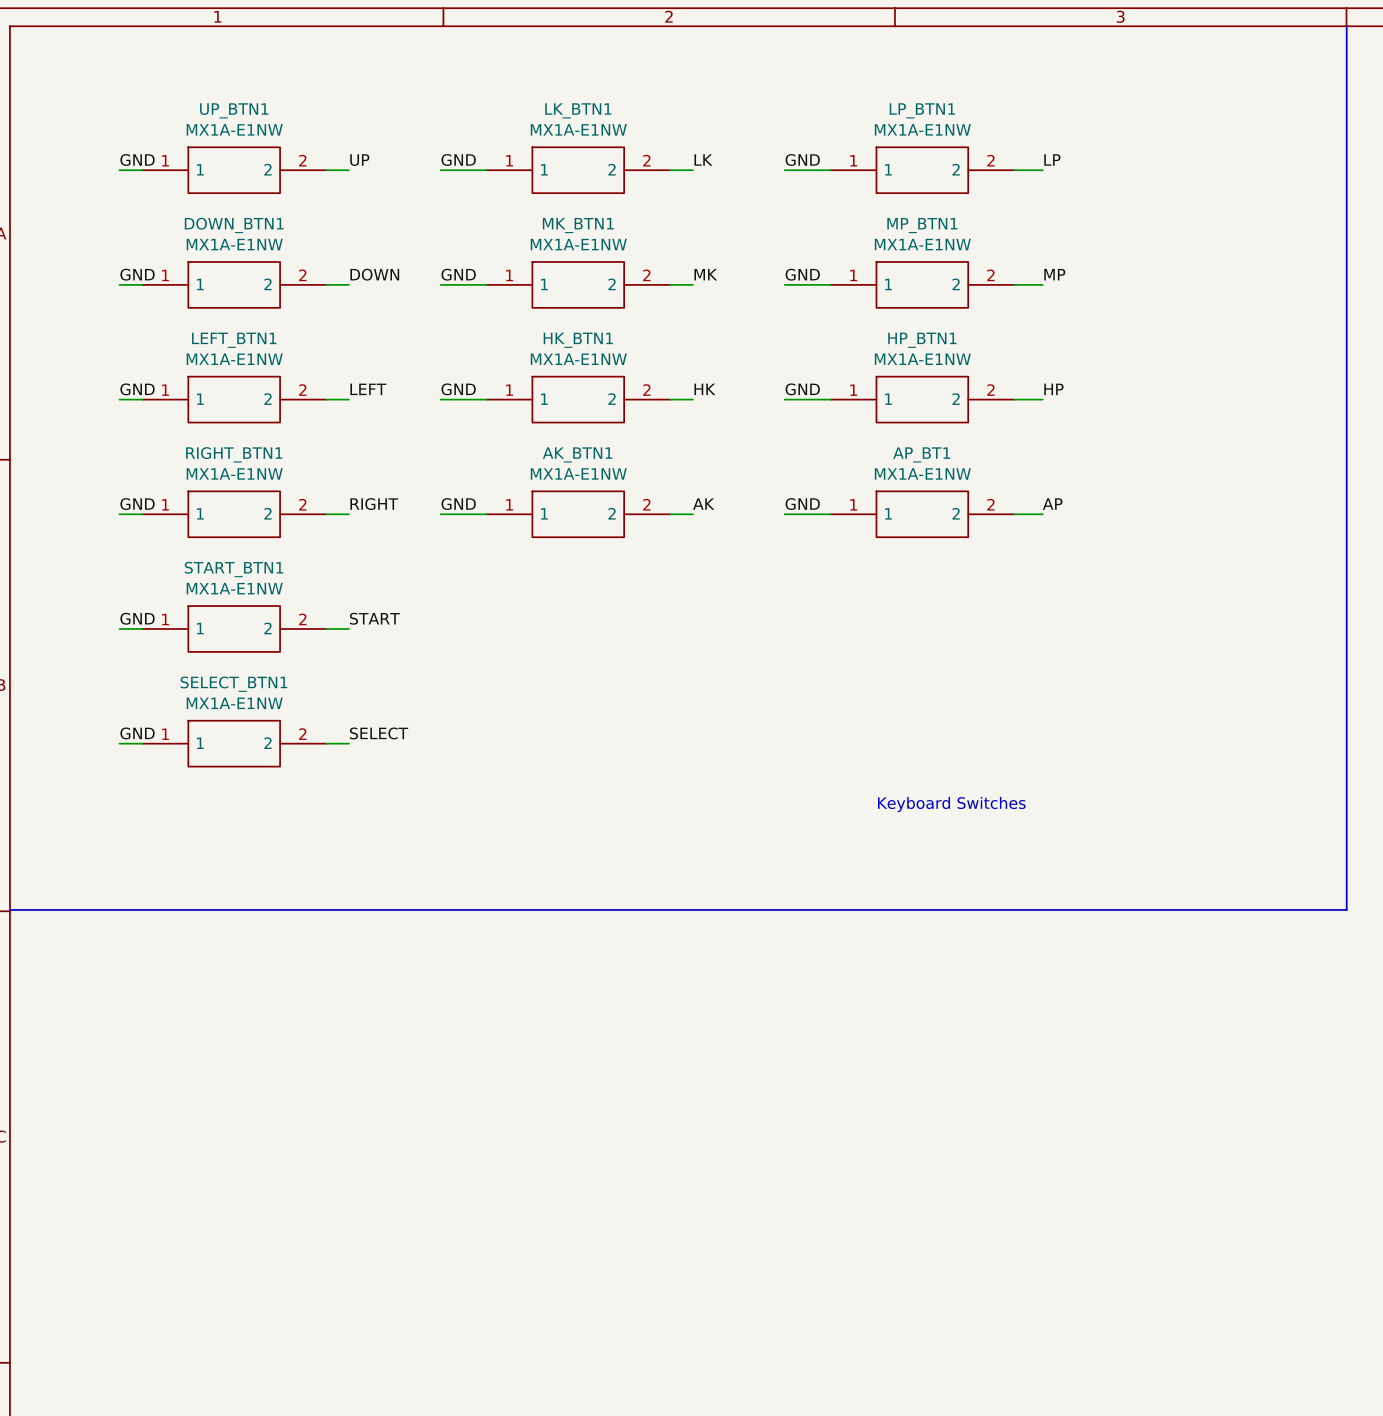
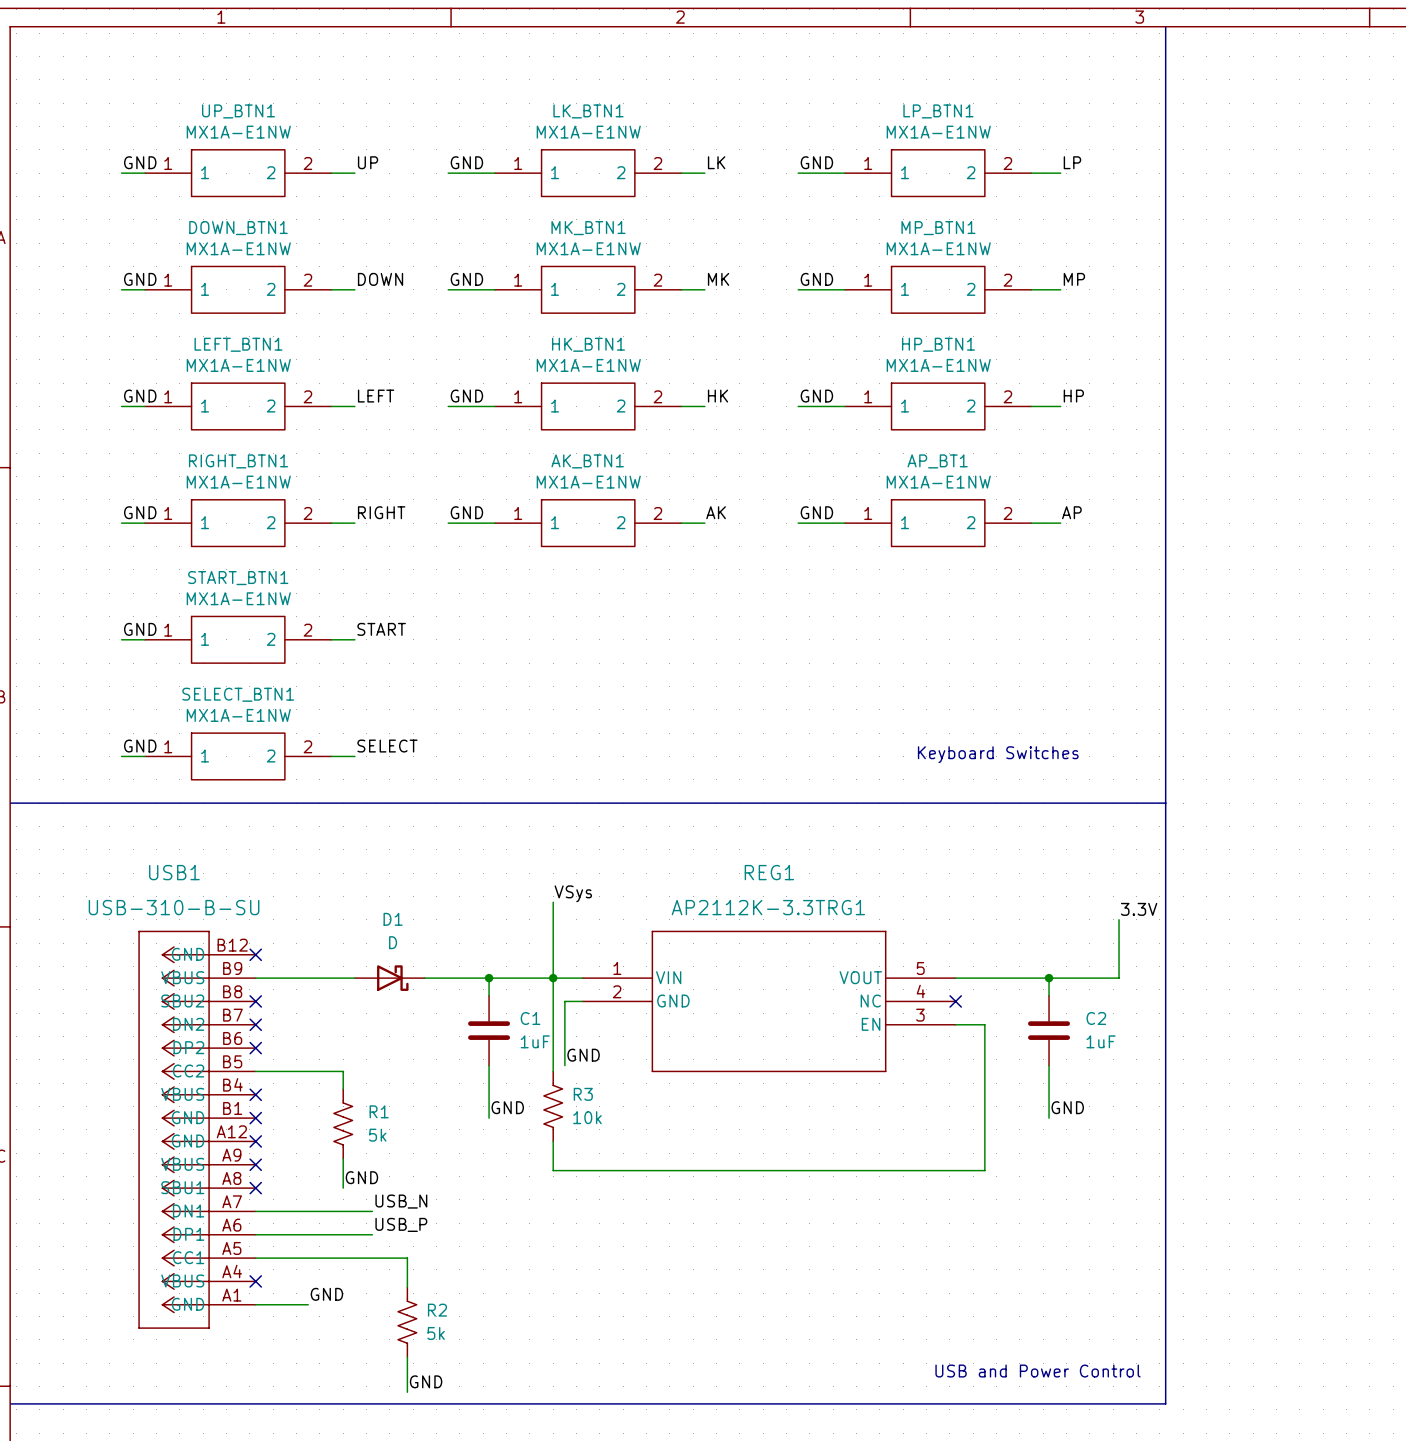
line: none -> (1165, 27) (1165, 1403) (10, 1403)
line: (1346, 26) (1346, 909) (10, 909) -> none
line: none -> (10, 803) (1165, 803)
text position: Keyboard Switches (951, 804) -> Keyboard Switches (998, 754)
label: none -> VSys (573, 893)
wire: none -> (553, 902) (553, 1071)
label: none -> 3.3V (1139, 909)
wire: none -> (1119, 919) (1119, 978) (955, 978)
no-connect mark: none -> (255, 954)
wire: none -> (255, 978) (354, 978)
D1: none -> D (389, 978)
wire: none -> (424, 978) (582, 978)
wire: none -> (489, 978) (489, 995)
junction: none -> (489, 978)
junction: none -> (553, 978)
wire: none -> (1049, 978) (1049, 995)
junction: none -> (1049, 978)
no-connect mark: none -> (255, 1001)
wire: none -> (582, 1001) (564, 1001) (564, 1065)
REG1: none -> AP2112K-3.3TRG1 (769, 1001)
no-connect mark: none -> (955, 1001)
no-connect mark: none -> (255, 1024)
wire: none -> (955, 1024) (984, 1024) (984, 1170) (553, 1170) (553, 1141)
C1: none -> 1uF (489, 1030)
C2: none -> 1uF (1049, 1030)
no-connect mark: none -> (255, 1048)
label: none -> GND (583, 1055)
wire: none -> (489, 1065) (489, 1118)
wire: none -> (1049, 1065) (1049, 1118)
wire: none -> (255, 1071) (343, 1071) (343, 1088)
no-connect mark: none -> (255, 1094)
R3: none -> 10k (553, 1106)
label: none -> GND (507, 1107)
label: none -> GND (1067, 1107)
no-connect mark: none -> (255, 1118)
R1: none -> 5k (343, 1123)
USB1: none -> USB-310-B-SU (197, 1129)
no-connect mark: none -> (255, 1141)
wire: none -> (343, 1158) (343, 1188)
no-connect mark: none -> (255, 1164)
label: none -> GND (361, 1177)
no-connect mark: none -> (255, 1188)
label: none -> USB_N (401, 1201)
wire: none -> (255, 1211) (372, 1211)
label: none -> USB_P (401, 1224)
wire: none -> (255, 1234) (372, 1234)
wire: none -> (255, 1258) (407, 1258) (407, 1287)
no-connect mark: none -> (255, 1281)
label: none -> GND (326, 1294)
wire: none -> (255, 1304) (308, 1304)
R2: none -> 5k (407, 1322)
wire: none -> (407, 1357) (407, 1392)
text: none -> USB and Power Control (1038, 1371)
label: none -> GND (426, 1381)

